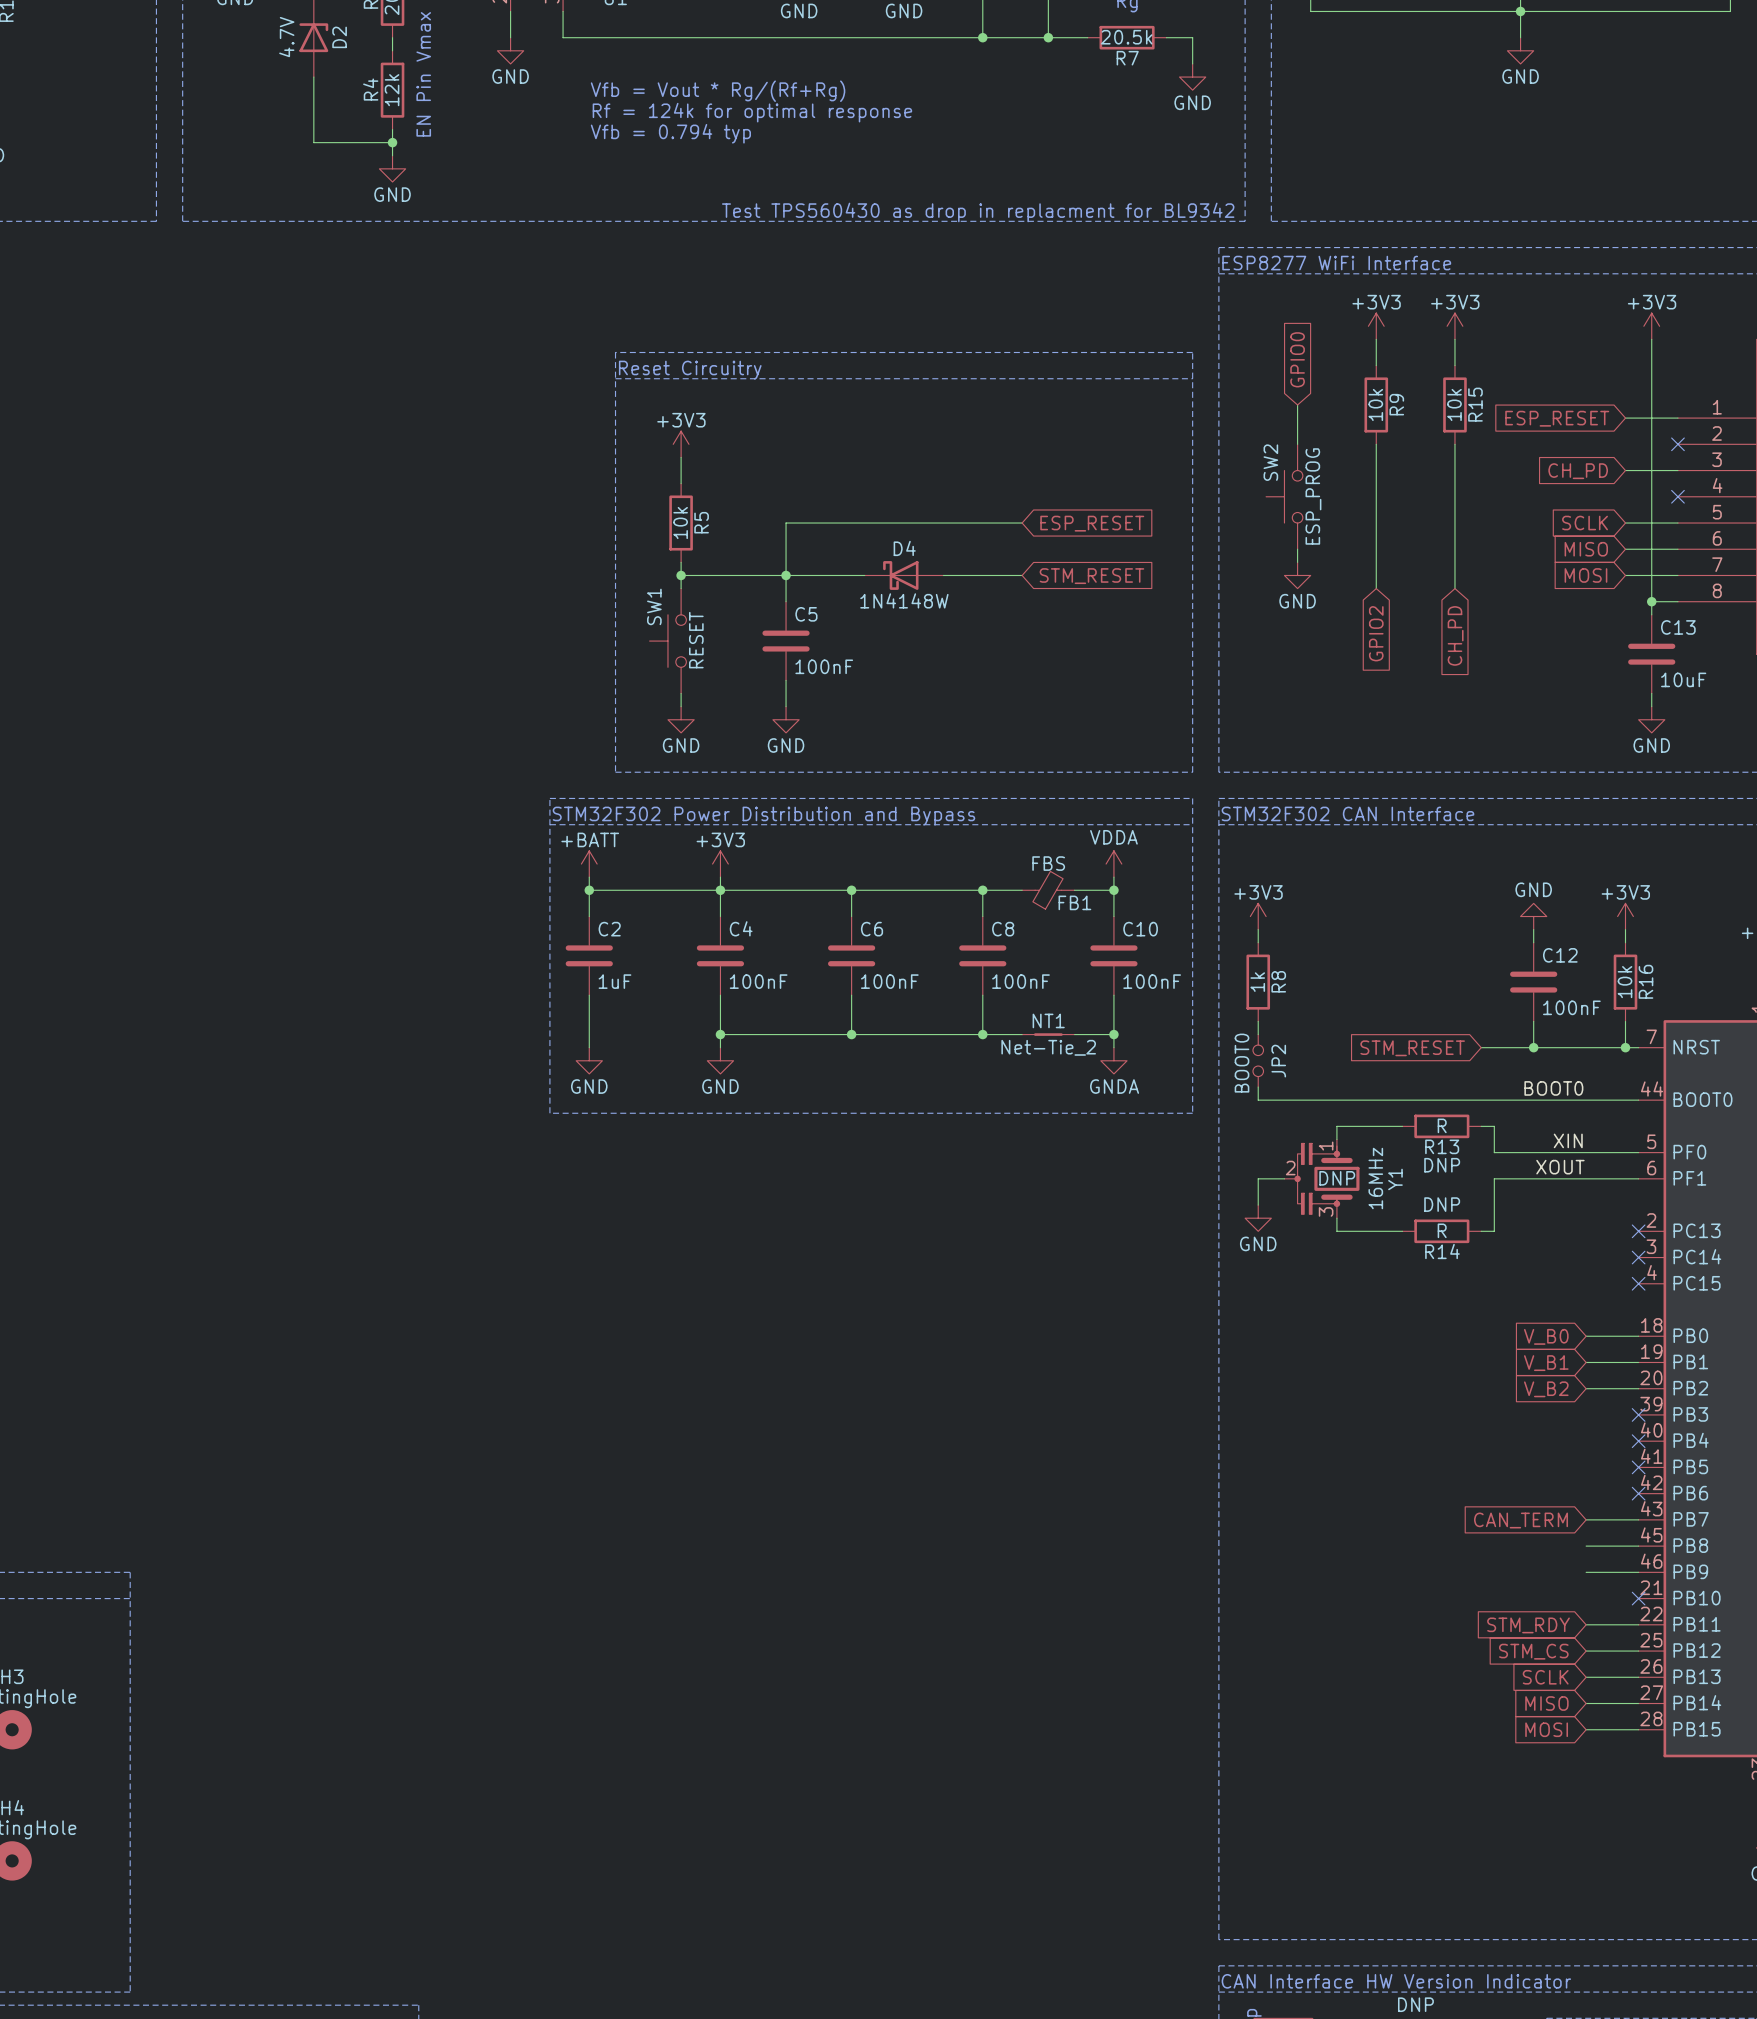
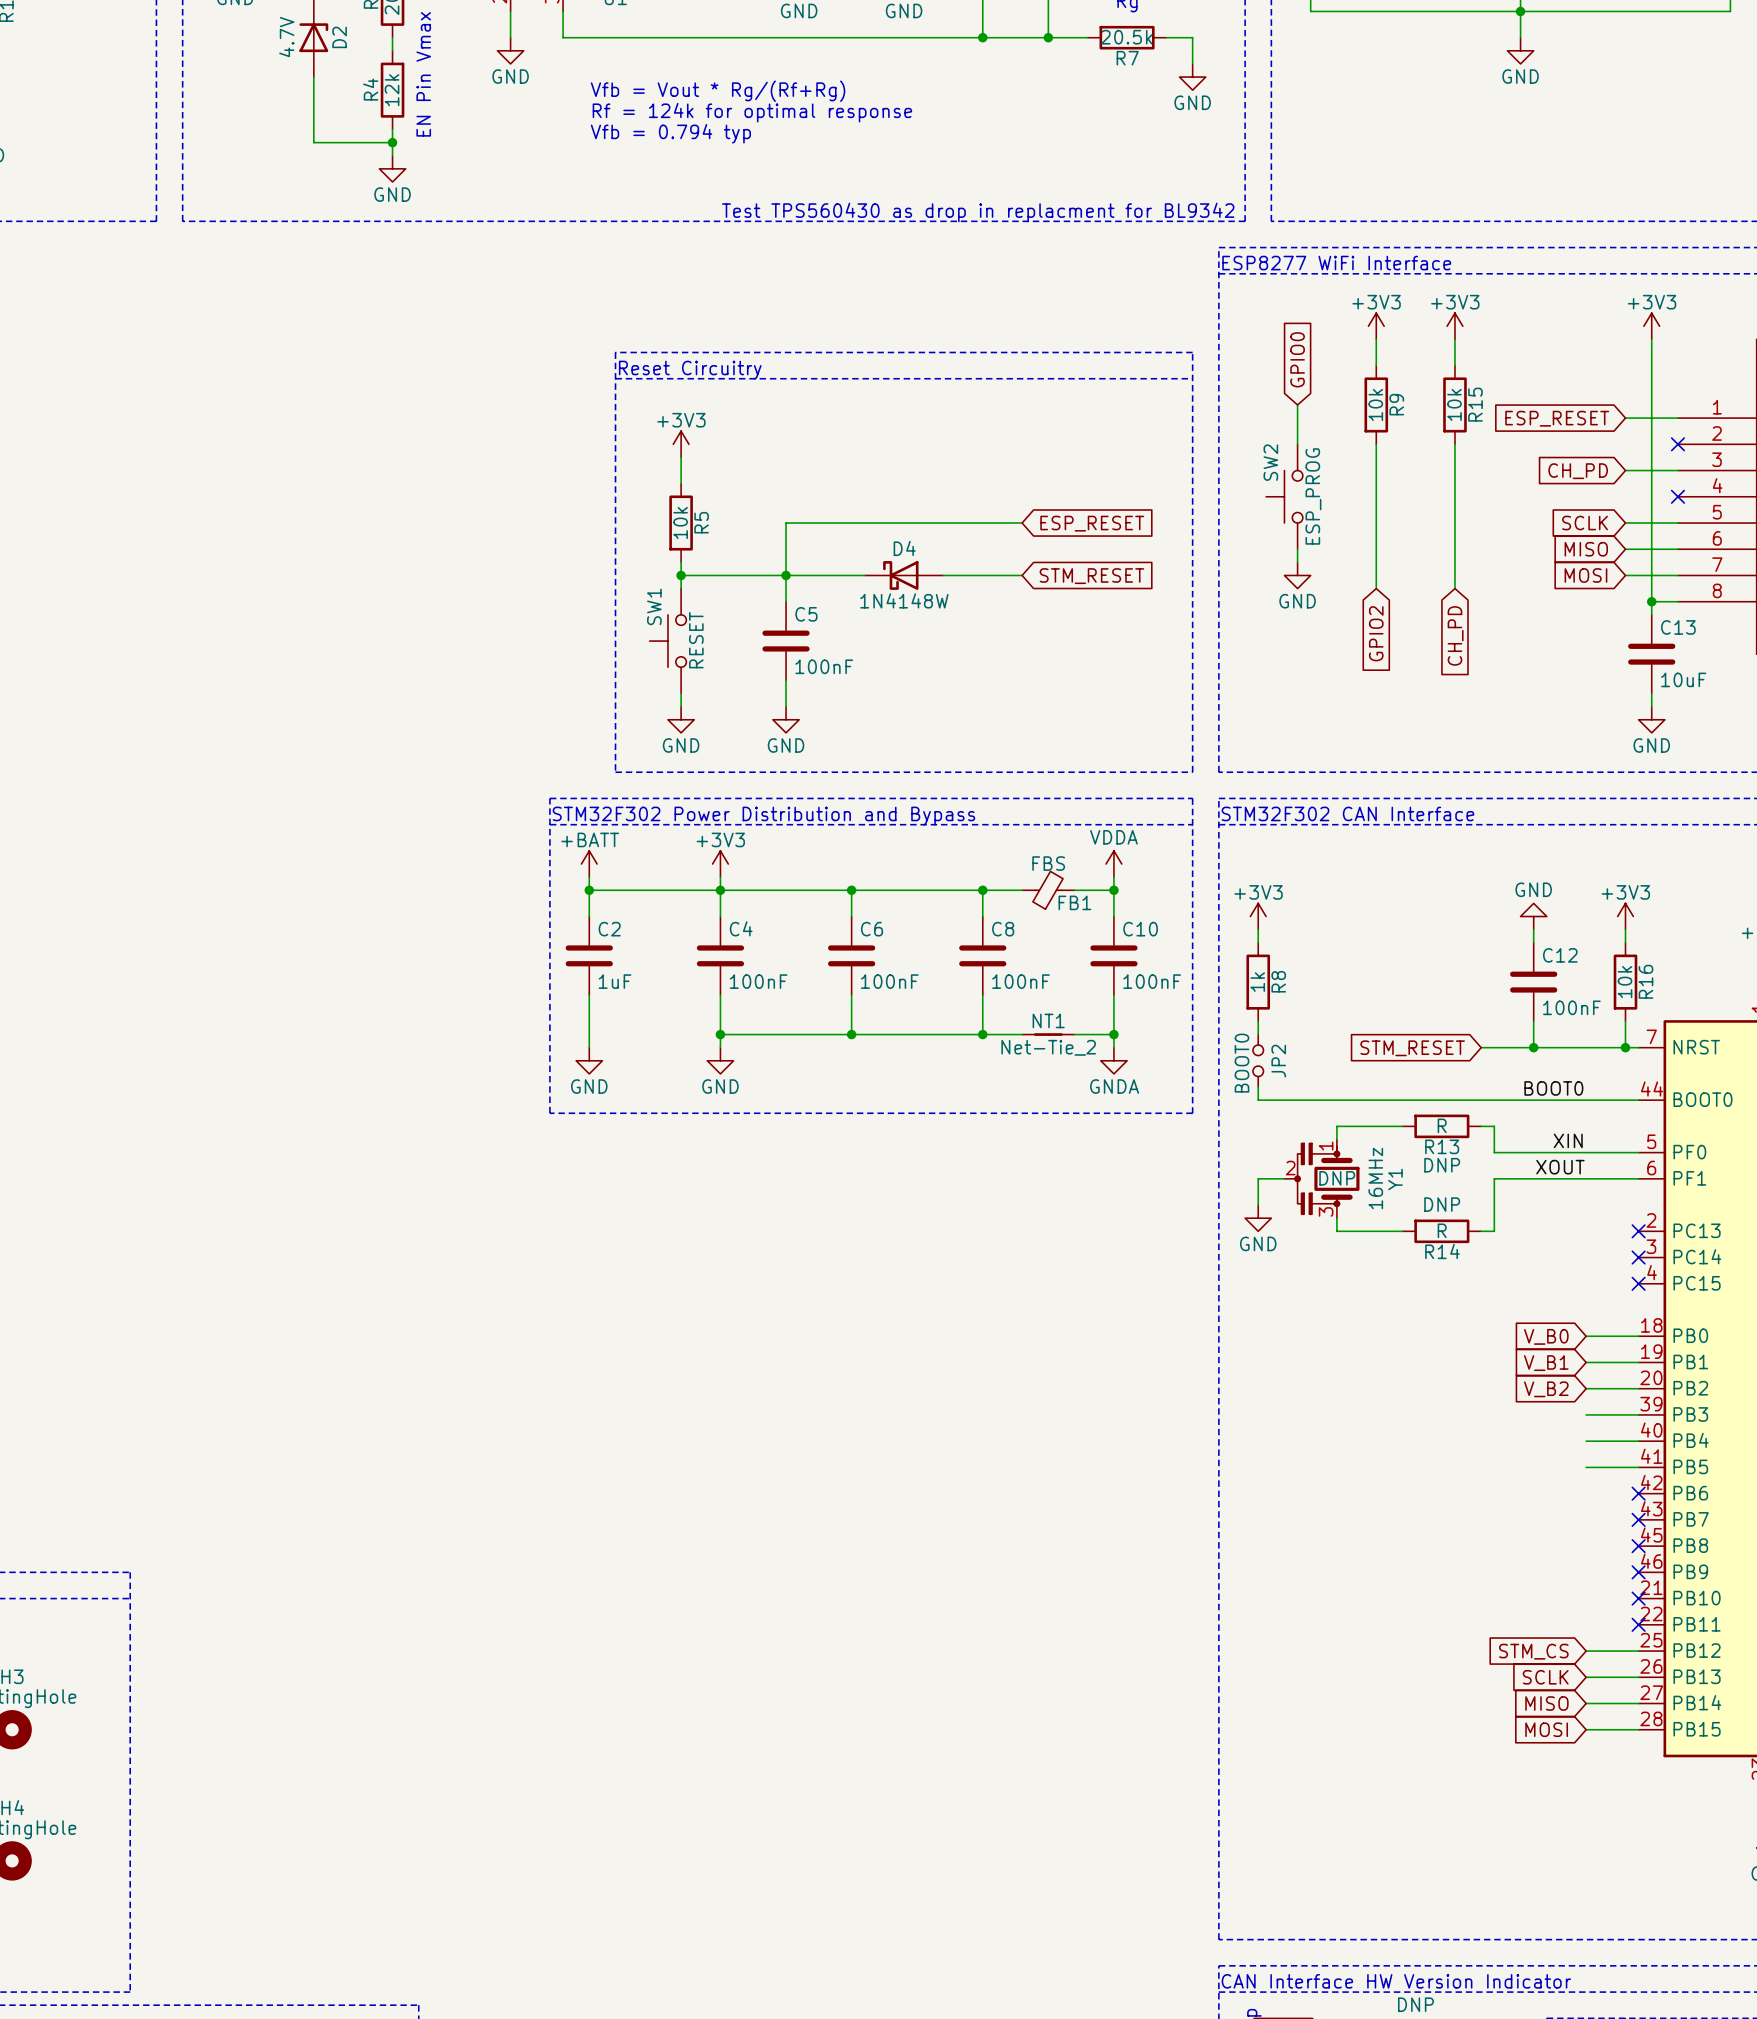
no-connect mark: (1638, 1414) -> none
no-connect mark: (1638, 1441) -> none
no-connect mark: (1638, 1467) -> none
wire: (1586, 1519) (1638, 1519) -> (1586, 1414) (1638, 1414)
no-connect mark: none -> (1638, 1519)
global label: CAN_TERM (1521, 1520) -> none
wire: (1586, 1546) (1638, 1546) -> (1586, 1441) (1638, 1441)
no-connect mark: none -> (1638, 1546)
wire: (1586, 1572) (1638, 1572) -> (1586, 1467) (1638, 1467)
no-connect mark: none -> (1638, 1572)
wire: (1586, 1624) (1638, 1624) -> none
no-connect mark: none -> (1638, 1624)
global label: STM_RDY (1528, 1625) -> none

